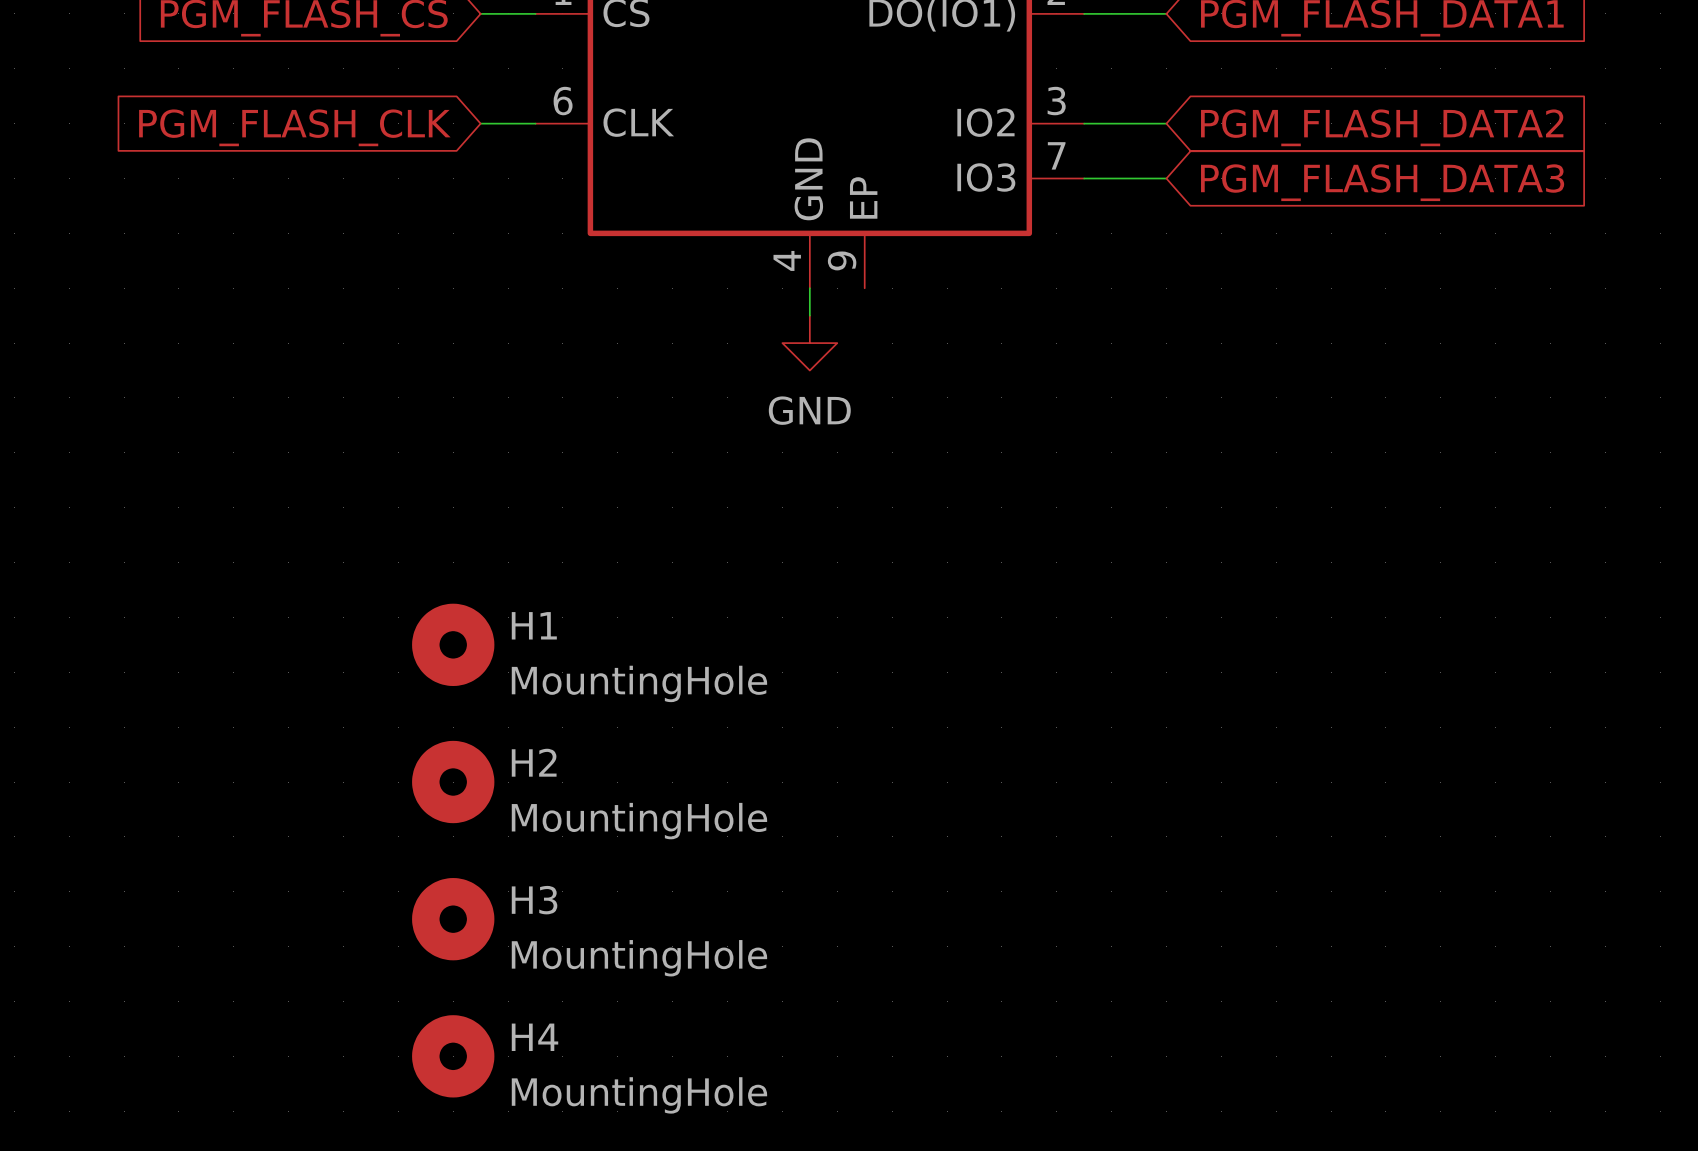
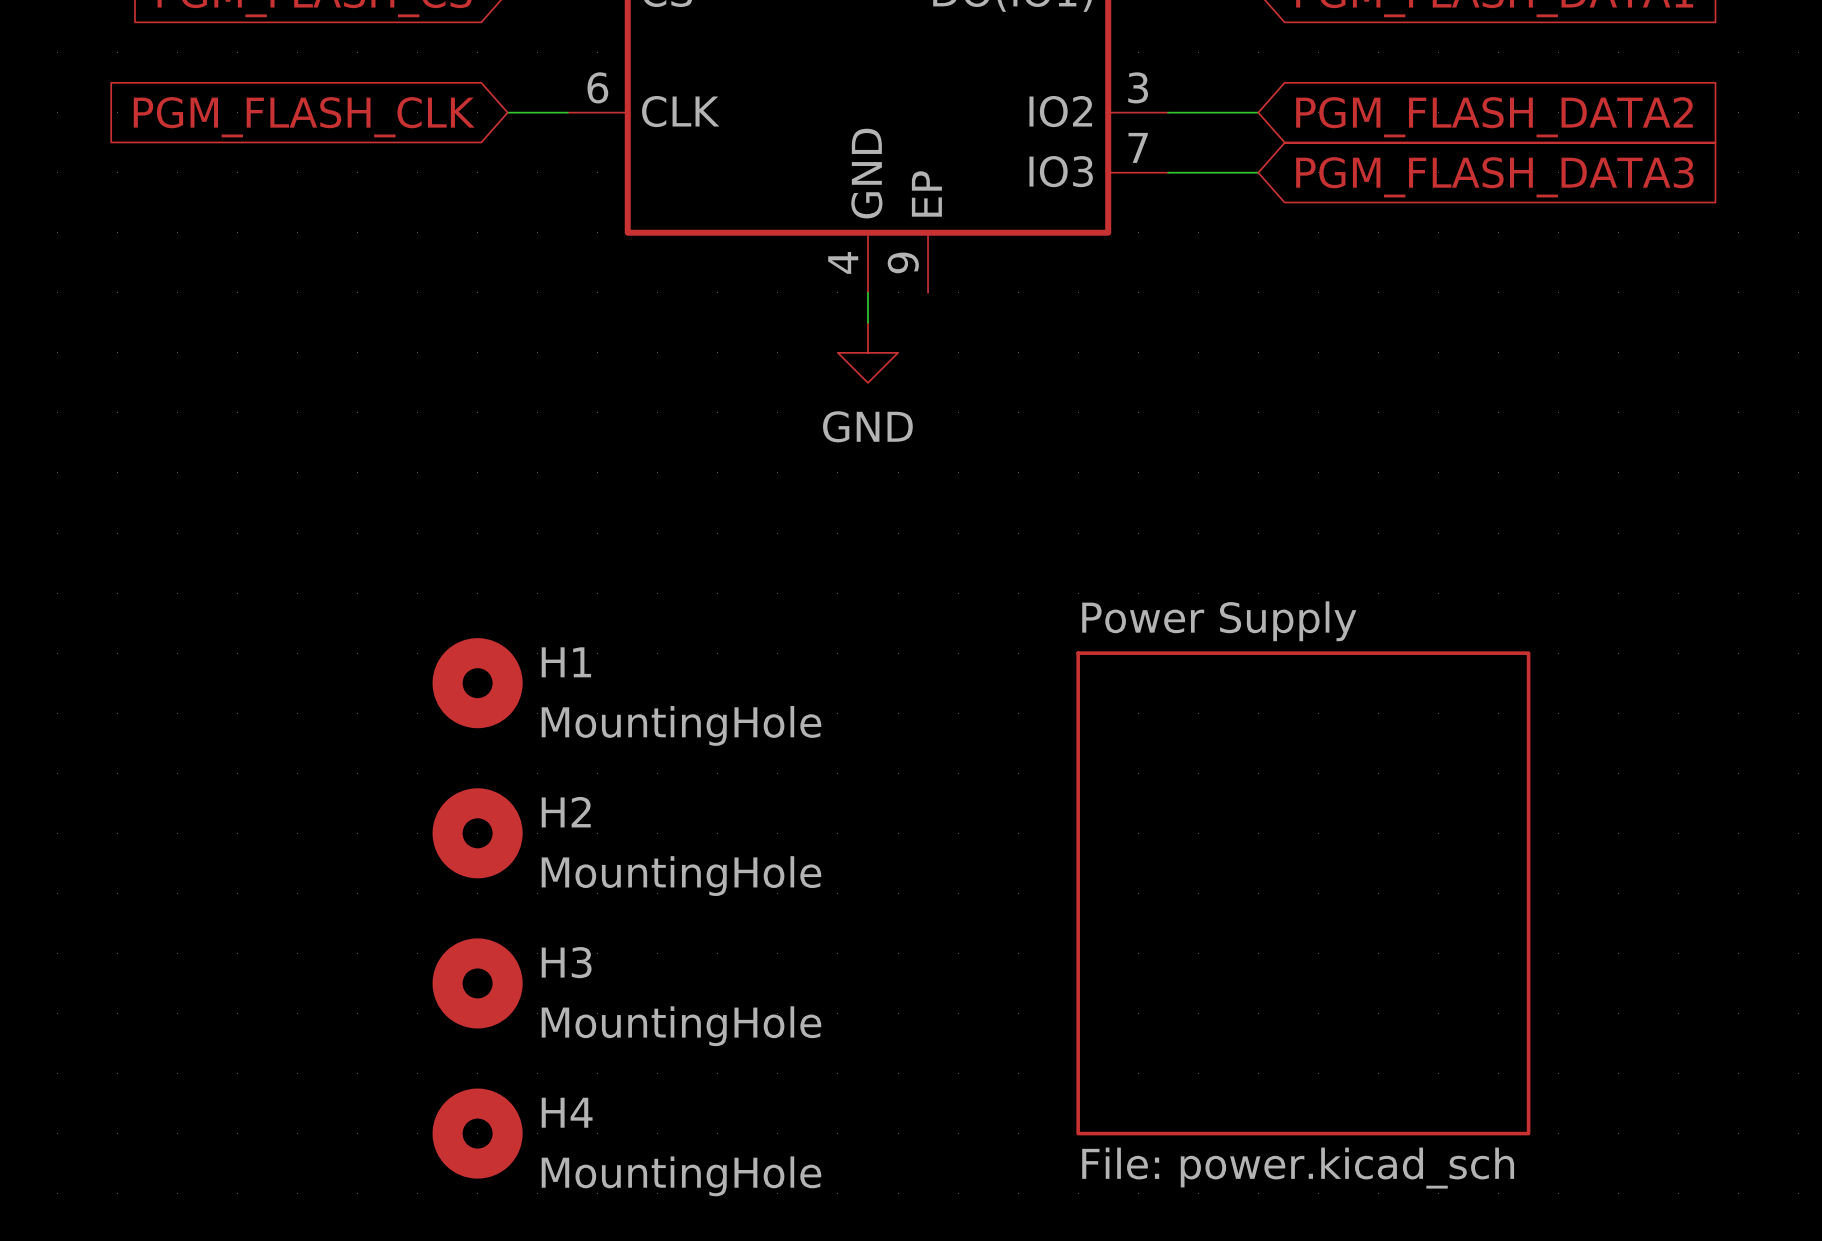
sheet Power Supply: none -> File: power.kicad_sch (1303, 893)

